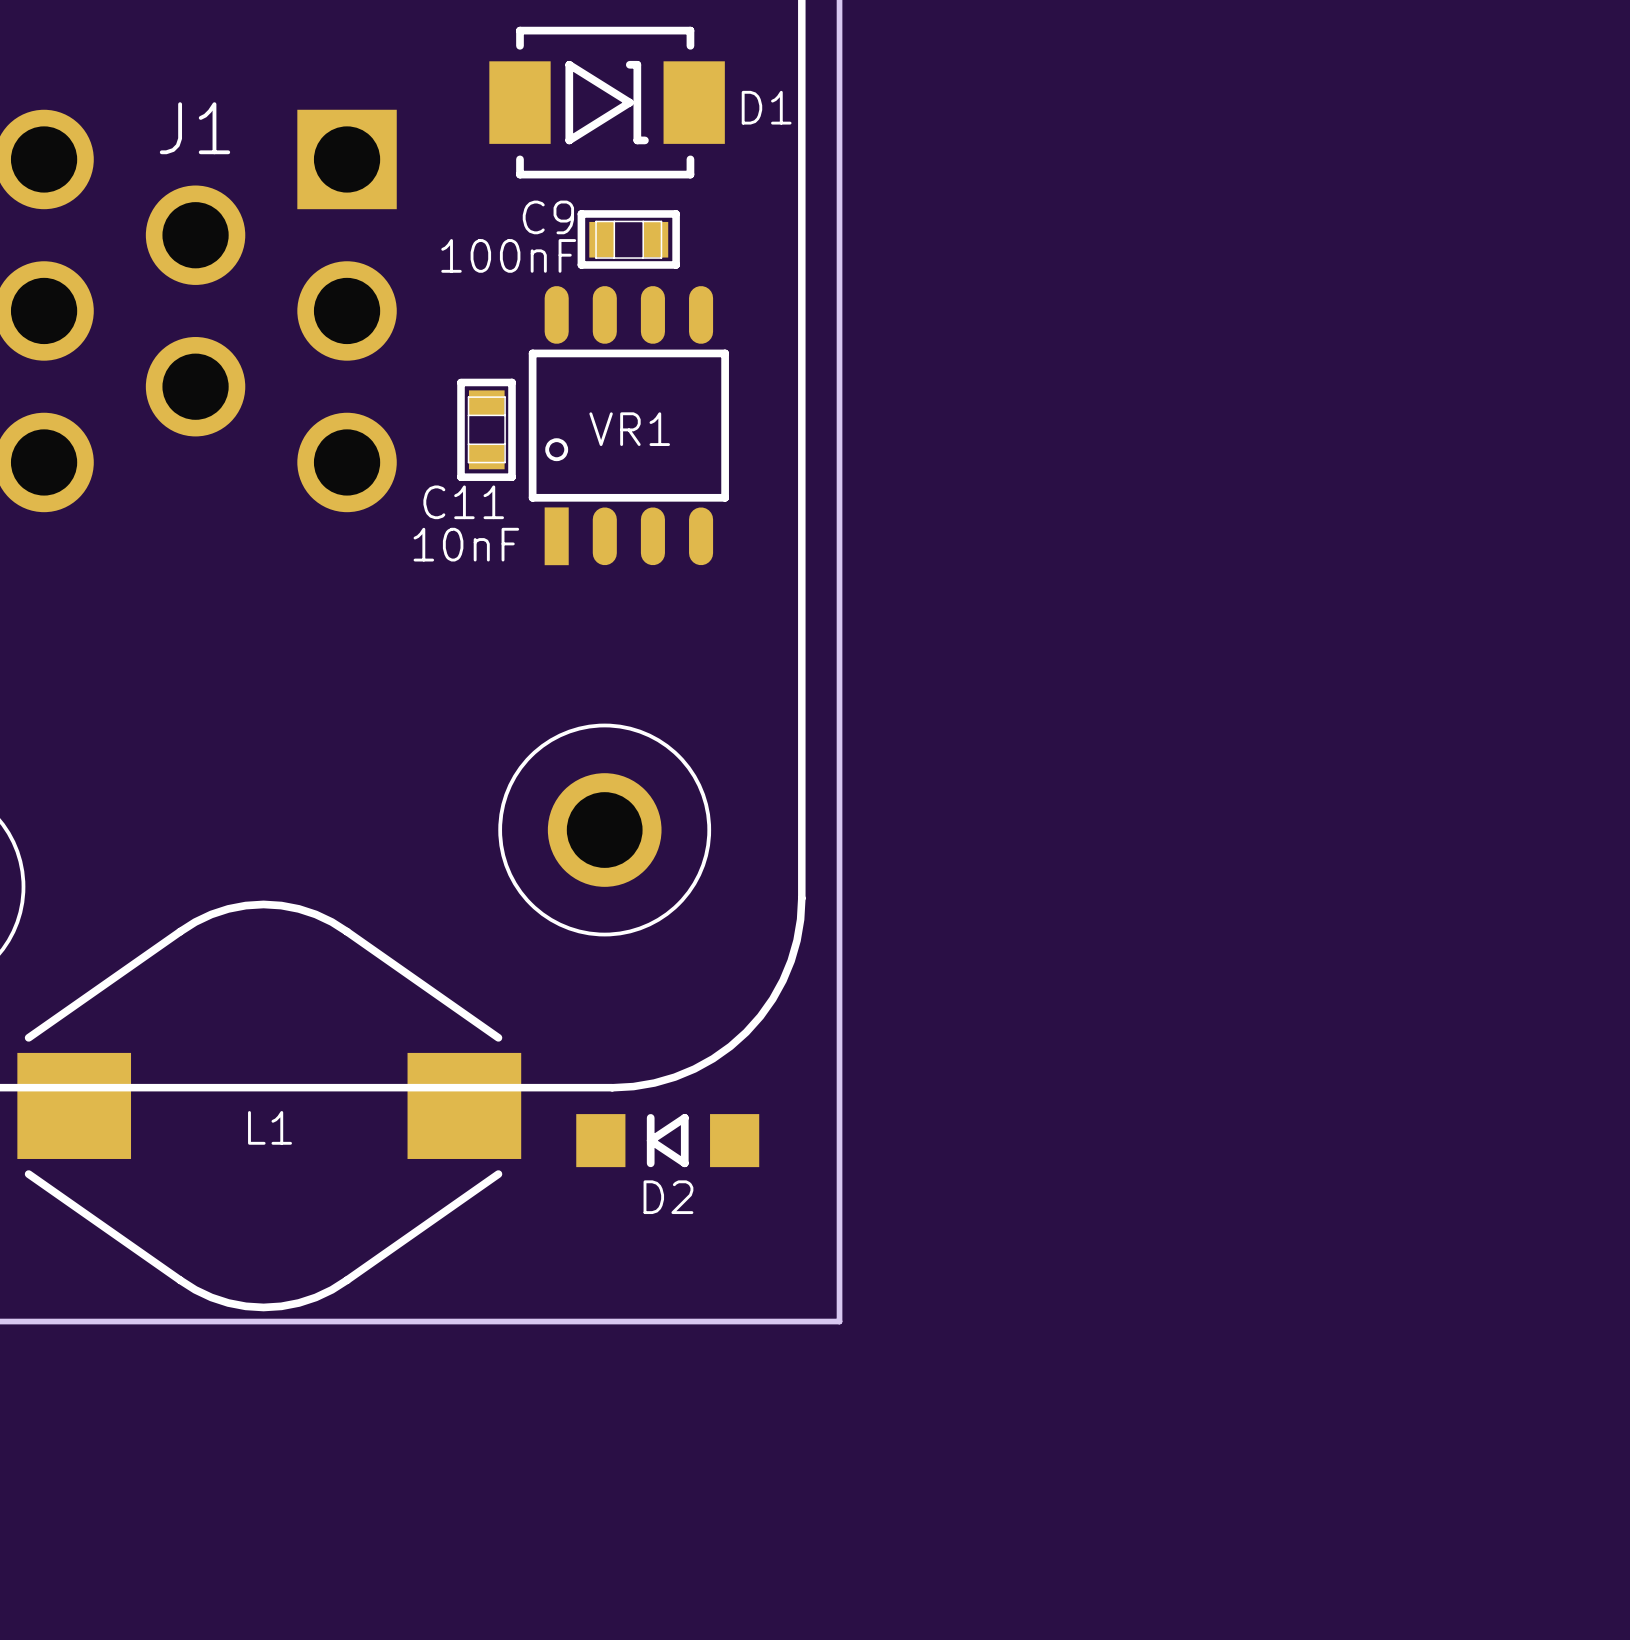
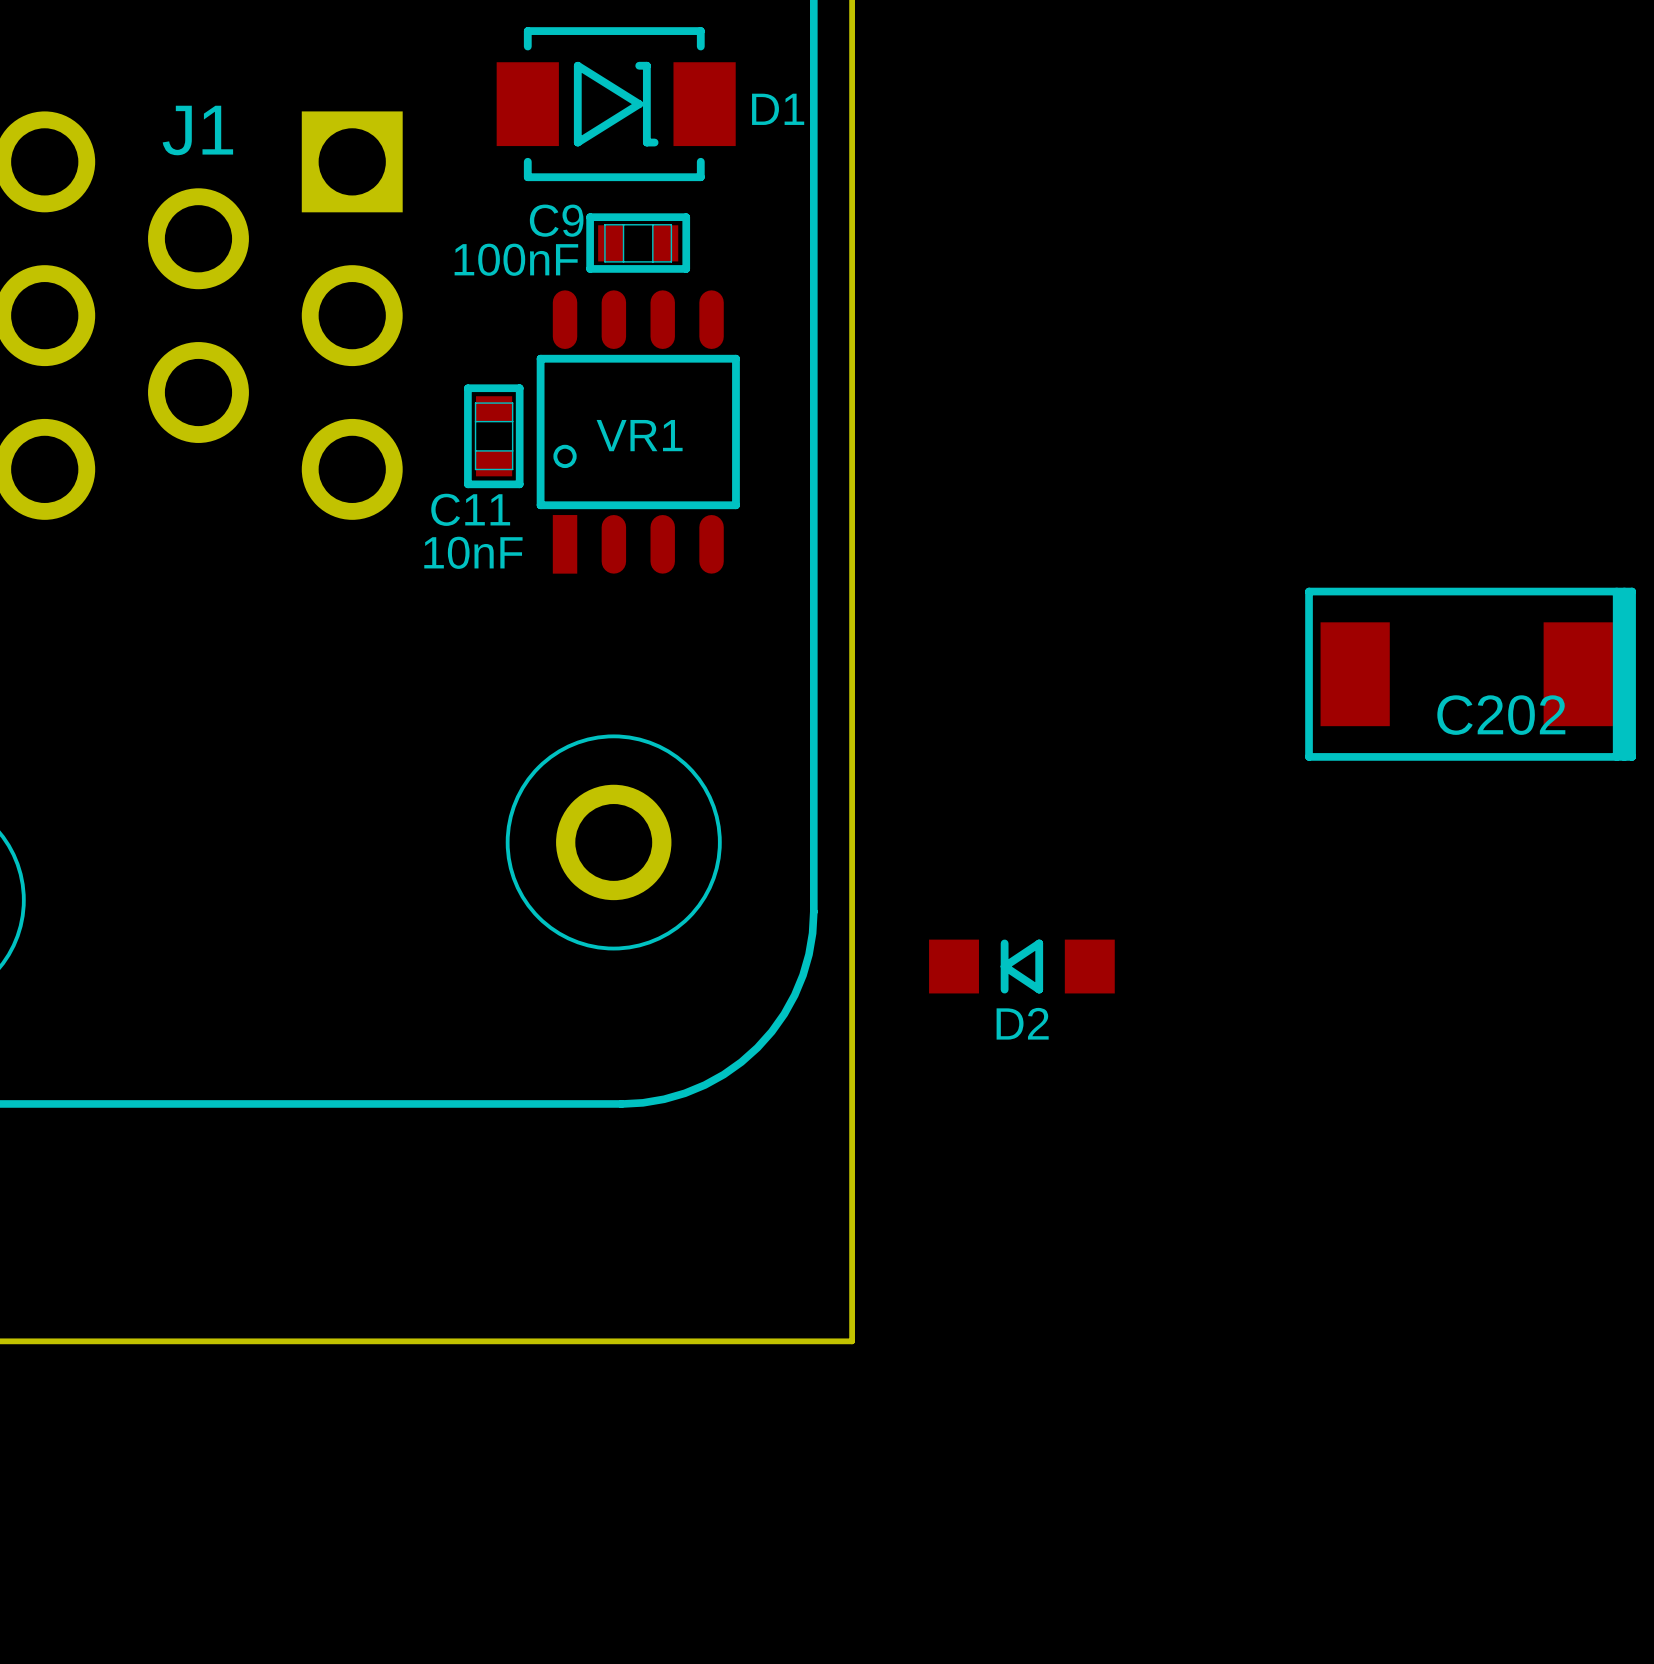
C202: none -> (1470, 674)
L1: (269, 1105) -> none
D2 position: (667, 1140) -> (1021, 966)

